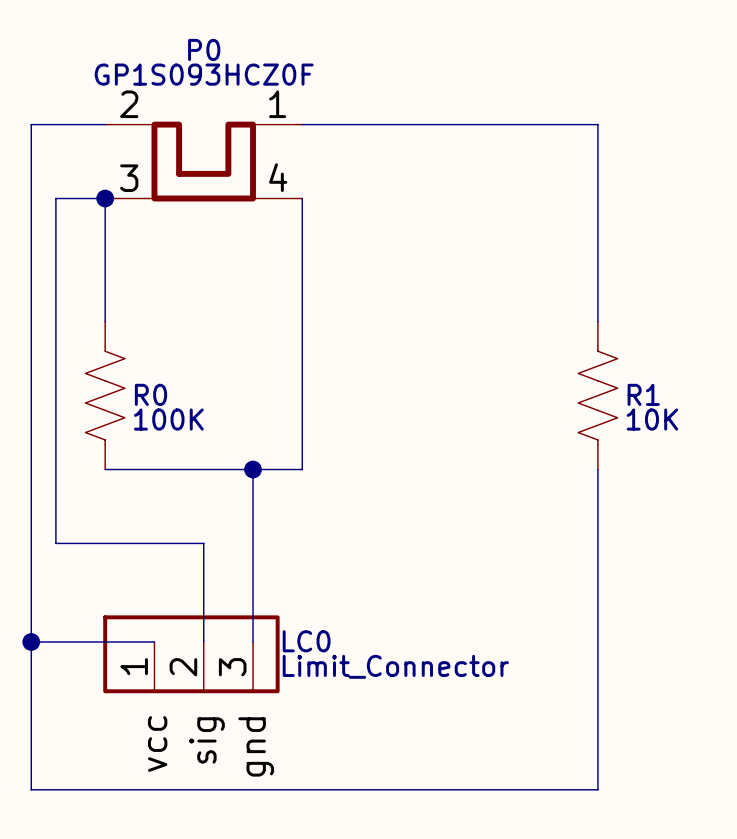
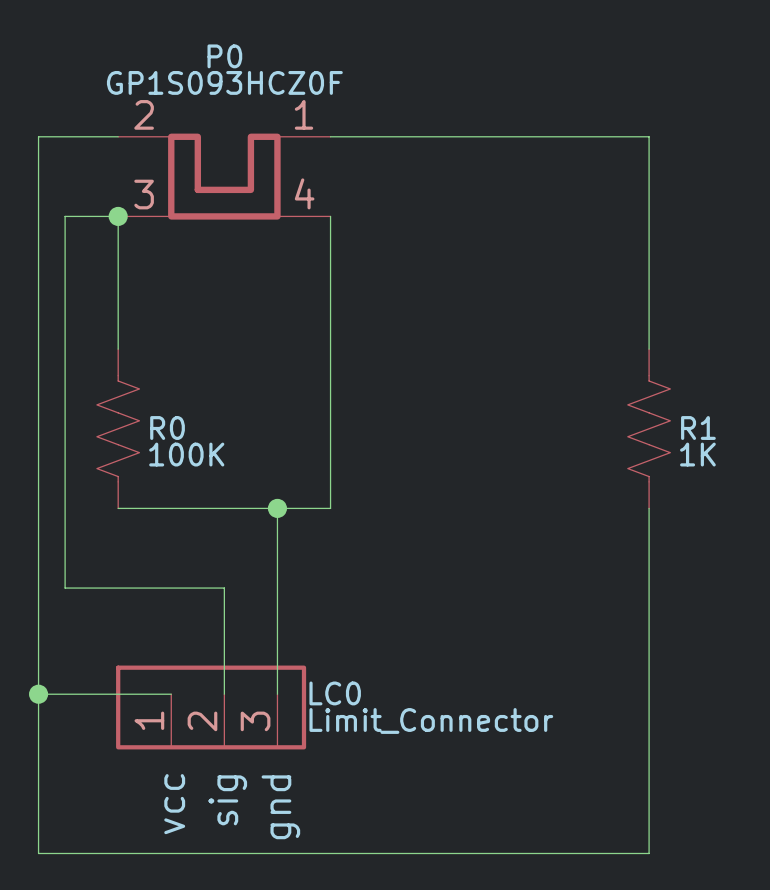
R1 value: 10K (652, 419) -> 1K (697, 454)

